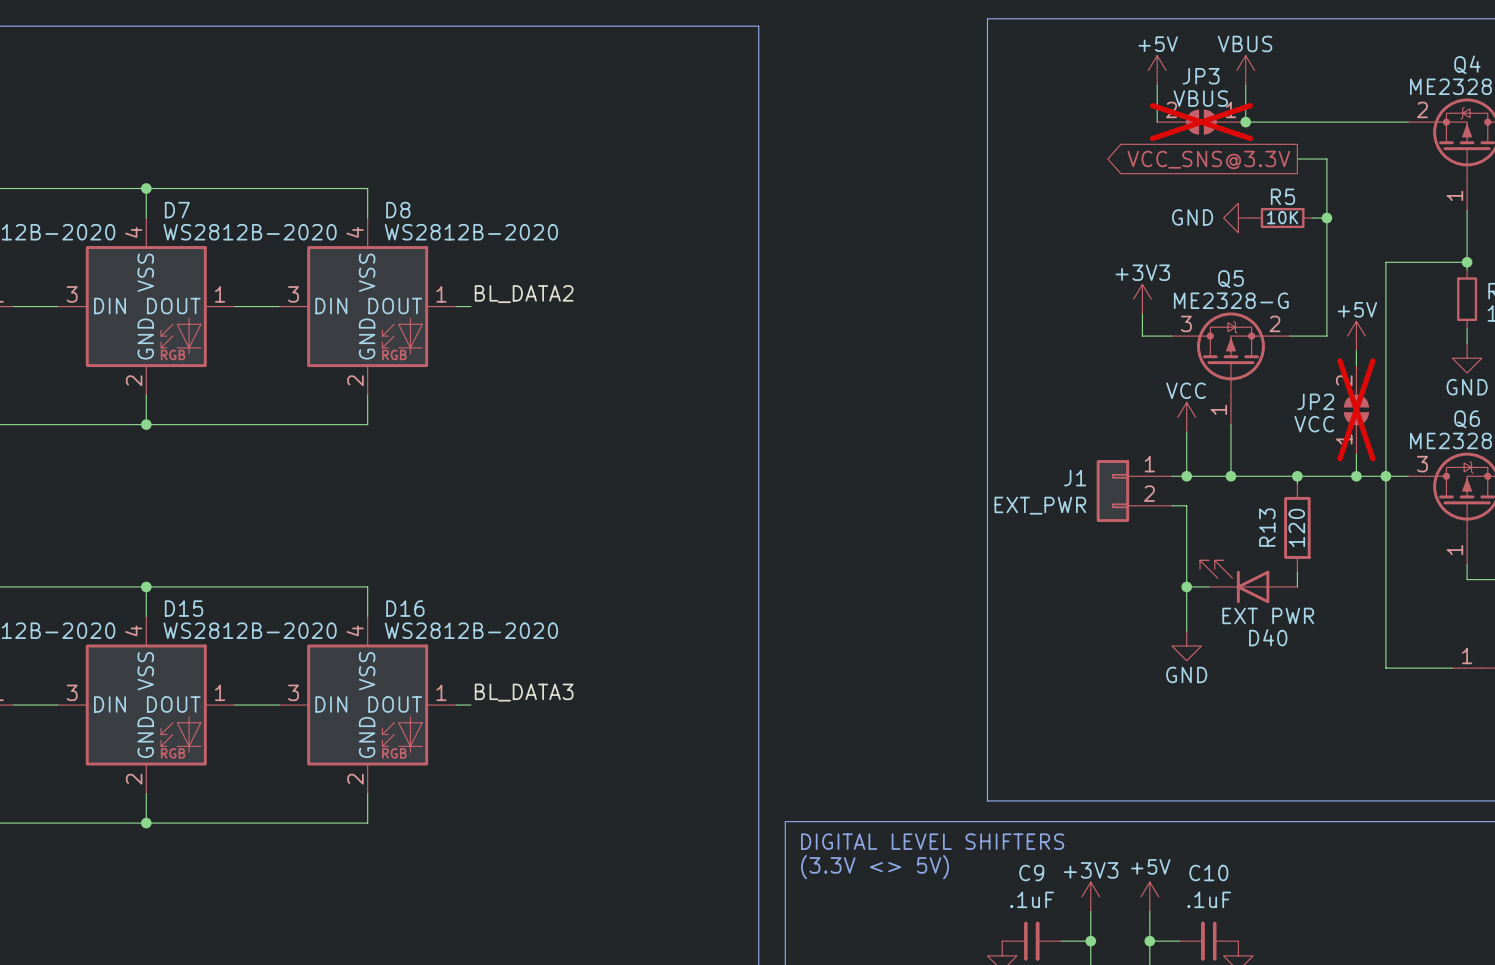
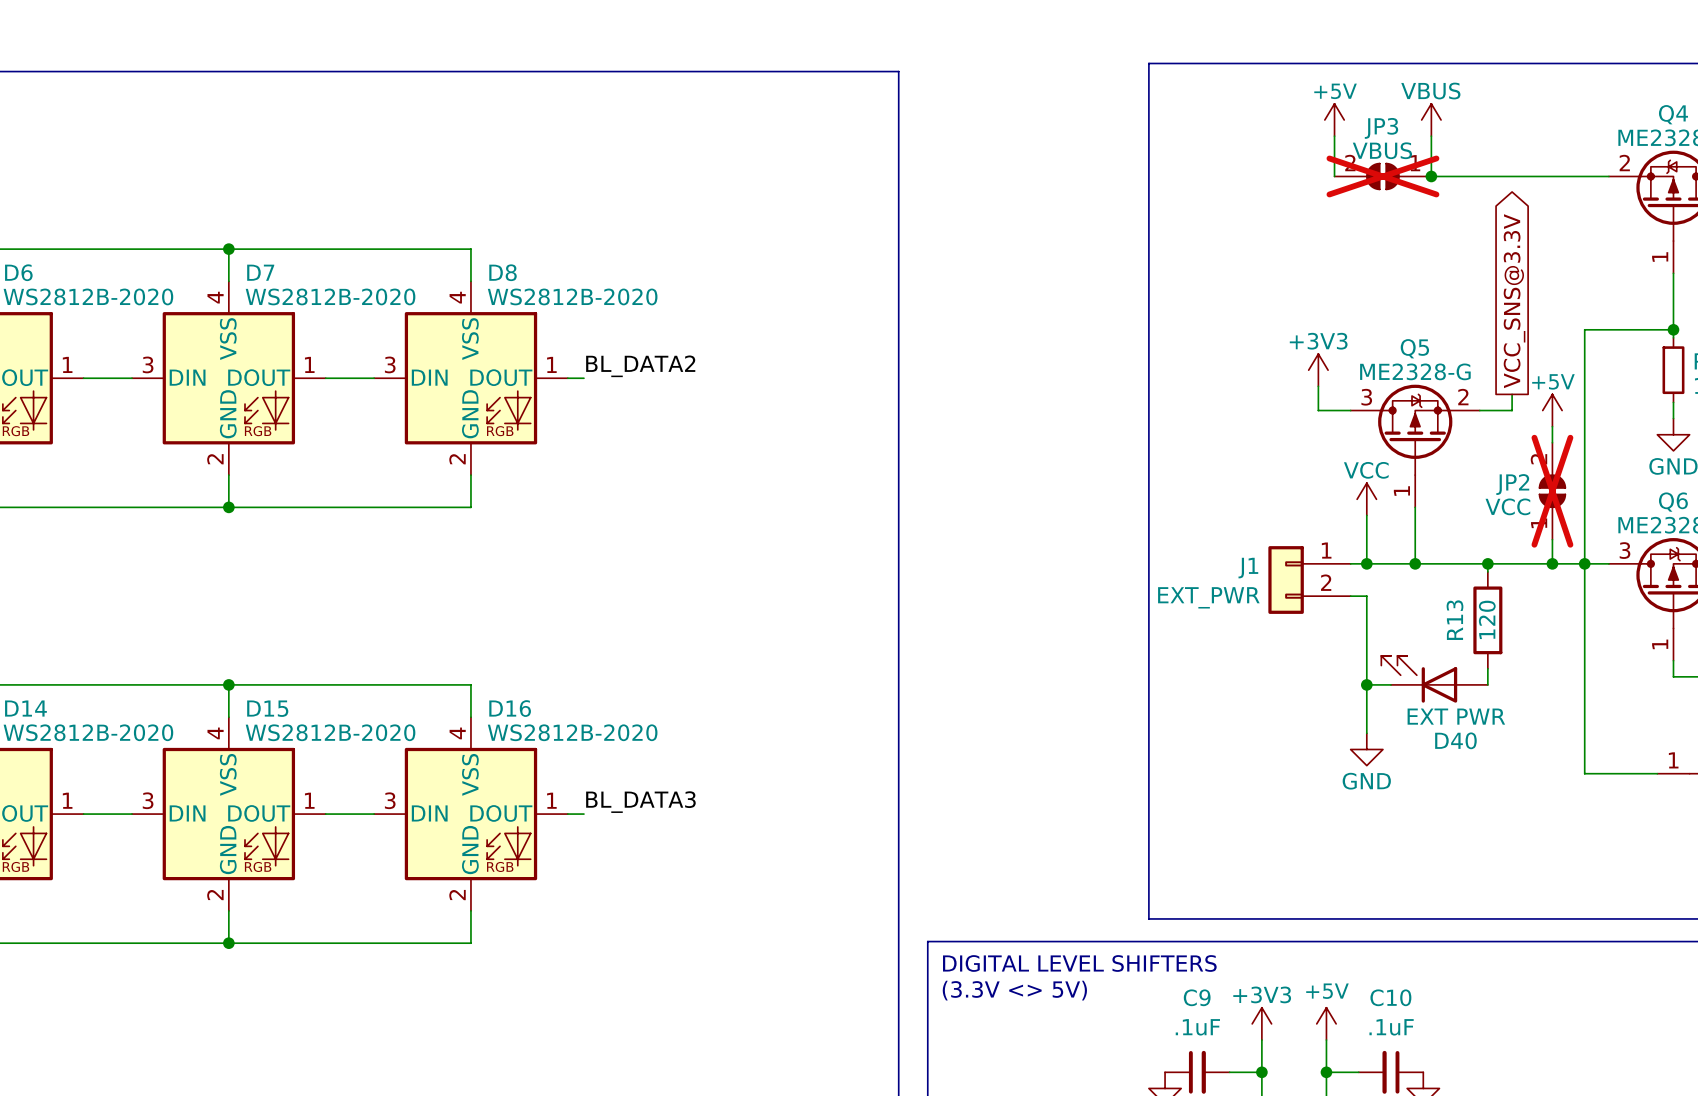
wire: (1297, 158) (1326, 158) (1326, 336) (1319, 336) -> (1512, 394) (1512, 410)
global label rotation: 0° (1208, 160) -> 90° clockwise (1514, 301)
power symbol: GND (1238, 218) -> none
R5: 10K (1282, 218) -> none
wire: (1312, 218) (1326, 218) -> none
junction: (1326, 218) -> none

